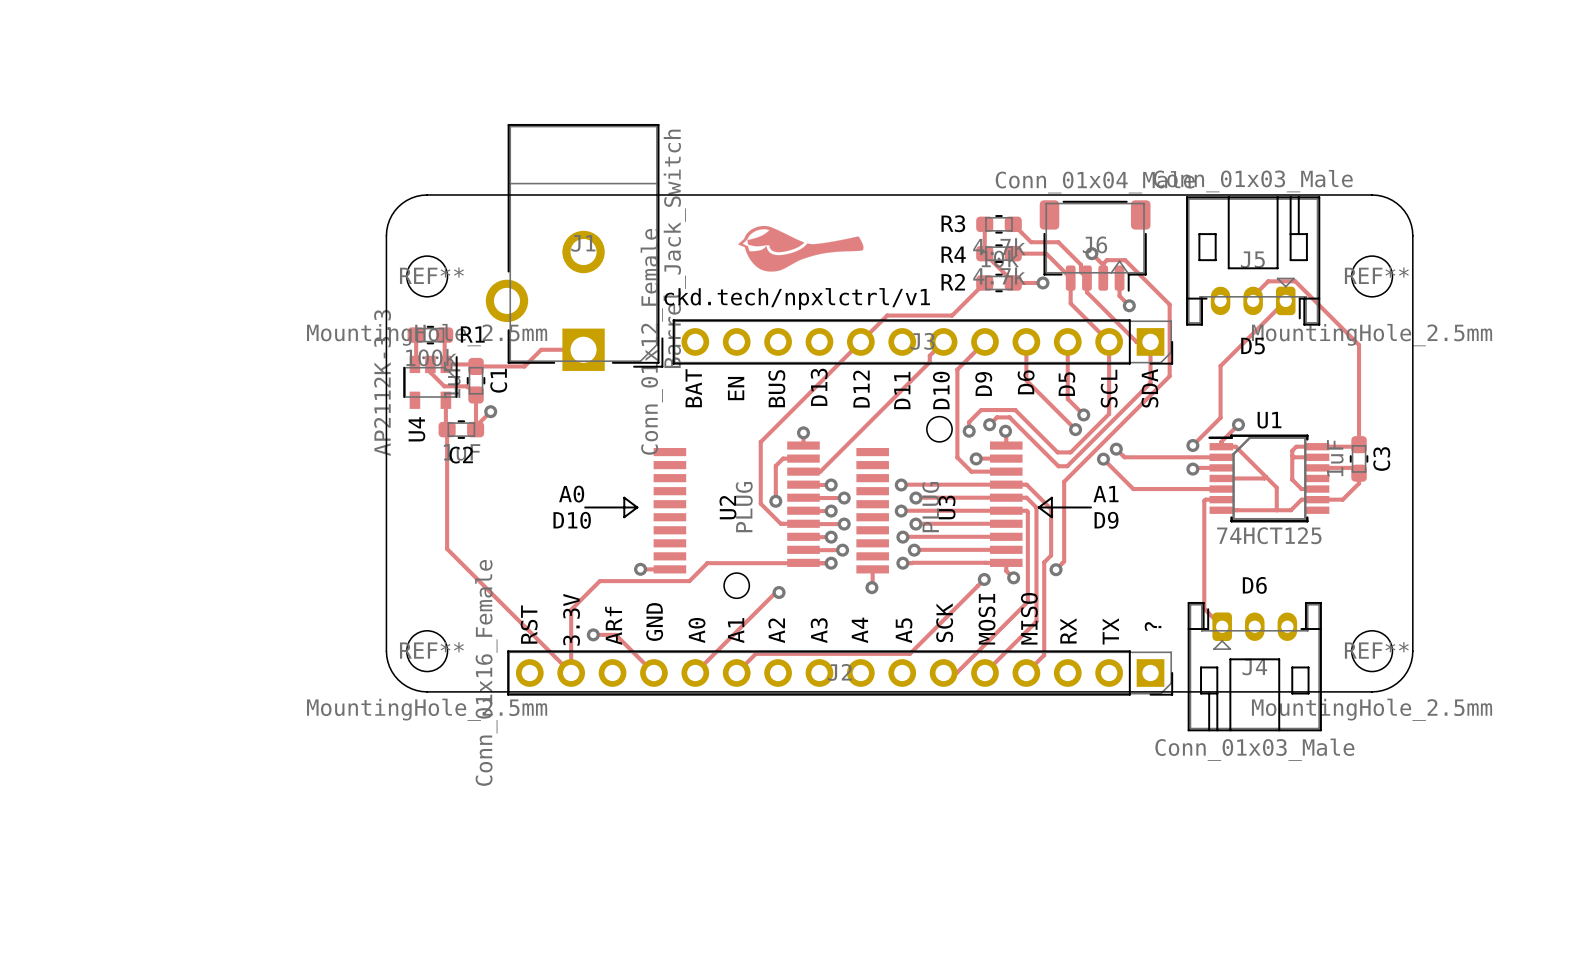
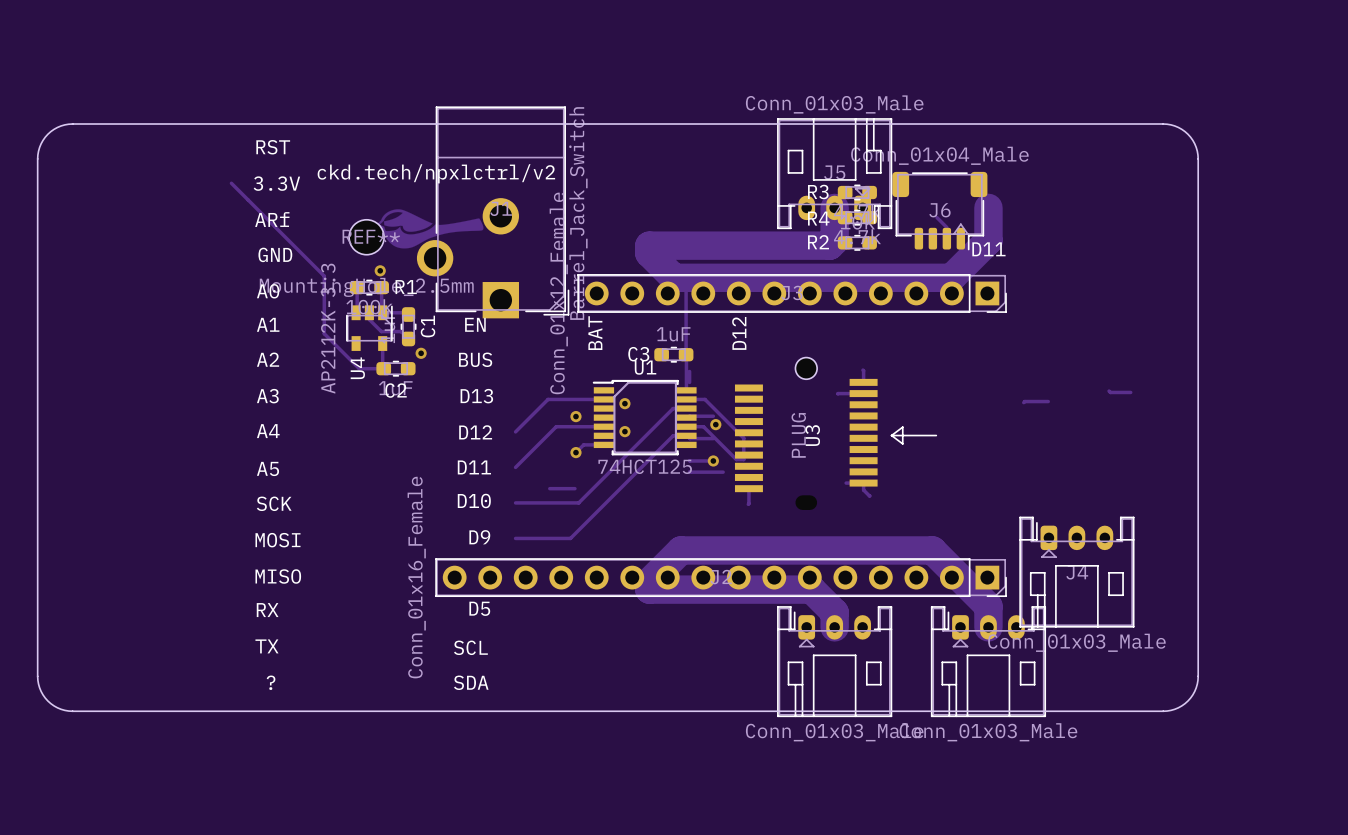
text: none -> RST (273, 147)
board edge: (427, 194) (1372, 194) (1387, 198) (1400, 206) (1407, 215) (1412, 235) (1412, 651) (1409, 666) (1396, 683) (1387, 688) (1372, 691) (427, 691) (411, 688) (394, 675) (387, 661) (386, 651) (386, 235) (389, 220) (398, 206) (411, 198) (427, 194) -> (72, 124) (61, 125) (47, 134) (39, 147) (37, 158) (37, 676) (43, 694) (57, 707) (72, 711) (1163, 711) (1181, 705) (1194, 691) (1198, 676) (1198, 158) (1192, 140) (1178, 127) (1163, 124) (72, 124)
text: none -> ckd.tech/npxlctrl/v2 (436, 173)
text: none -> 3.3V (276, 183)
track: (984, 224) (984, 253) (1013, 282) (1042, 282) -> none
track: (1013, 224) (1031, 242) (1058, 242) (1080, 264) (1080, 272) (1086, 278) (1086, 292) (1136, 341) (1150, 341) (1150, 382) (1067, 466) (1058, 466) (1009, 417) (996, 417) (989, 424) -> none
track: none -> (834, 207) (834, 240) (829, 245) (649, 245)
track: none -> (988, 207) (988, 240) (951, 277) (673, 277) (649, 253) (649, 245)
drawing position: (800, 248) -> (429, 228)
track: (1013, 253) (1046, 253) (1070, 278) (1070, 303) (1109, 341) (1109, 413) (1070, 452) (1057, 452) (1015, 410) (981, 410) (969, 422) (969, 431) -> none
via: (1091, 253) -> none
text: none -> ARf (272, 219)
J5 position: (1253, 260) -> (834, 173)
REF**: MountingHole_2.5mm (1372, 276) -> none
track: (1103, 278) (1103, 263) (1106, 260) (1125, 260) (1169, 304) (1169, 376) (1064, 481) (1064, 561) (1056, 569) -> none
track: (984, 282) (952, 315) (887, 315) (760, 442) (760, 503) (780, 523) (844, 524) -> none
via: (1042, 282) -> none
track: none -> (649, 245) (686, 282) (686, 390)
text: none -> D11 (988, 249)
text: none -> GND (275, 254)
text: ckd.tech/npxlctrl/v1 (797, 298) -> none
track: (1253, 300) (1253, 296) (1268, 281) (1295, 281) (1359, 345) (1359, 444) (1357, 446) (1296, 446) (1292, 450) (1292, 479) (1301, 489) (1317, 489) -> none
track: (1285, 300) (1220, 366) (1220, 417) (1192, 445) -> none
via: (1129, 305) -> none
via: none -> (380, 270)
text: none -> A0 (268, 291)
track: (943, 341) (929, 355) (929, 362) (820, 471) (803, 471) -> none
track: (984, 341) (957, 369) (957, 457) (971, 471) (1006, 471) -> none
track: (1026, 341) (1026, 380) (1075, 429) -> none
track: (1067, 341) (1067, 398) (1083, 414) -> none
text: D5 (1253, 346) -> none
track: (583, 349) (541, 349) (524, 366) (476, 366) -> none
text: none -> A1 (268, 324)
text: D6 (1026, 382) -> none
text: D9 (983, 383) -> none
text: D5 (1066, 384) -> none
text rotation: 0° (819, 387) -> 90° clockwise (476, 396)
text position: D13 (819, 387) -> D13 (476, 396)
text rotation: 0° (736, 388) -> 90° clockwise (475, 324)
text position: EN (736, 388) -> EN (475, 324)
text rotation: 0° (776, 388) -> 90° clockwise (475, 359)
text position: BUS (776, 388) -> BUS (475, 359)
text: SCL (1109, 388) -> none
text: SDA (1149, 388) -> none
text: D11 (902, 390) -> none
text: D10 (941, 390) -> none
track: (476, 394) (476, 429) (475, 429) (475, 426) (490, 411) -> none
via: (1083, 414) -> none
text: none -> A2 (268, 359)
via: (989, 424) -> none
track: (1238, 424) (1221, 441) (1221, 446) (1235, 446) (1276, 487) (1276, 510) -> none
via: (1238, 424) -> none
track: (447, 429) (447, 548) (571, 673) (571, 609) (599, 581) (689, 581) (707, 563) (831, 563) -> (383, 368) (359, 368) (324, 333) (324, 276) (231, 183)
via: (1075, 429) -> none
via: (969, 431) -> none
via: (1005, 431) -> none
via: (803, 432) -> none
via: (1192, 445) -> none
track: (1116, 449) (1124, 457) (1221, 457) -> none
via: (1116, 449) -> none
track: (803, 458) (783, 458) (775, 465) (775, 501) -> none
via: (976, 458) -> none
C3 rotation: 0° (1359, 458) -> 90° clockwise (673, 354)
C3 position: (1359, 458) -> (673, 354)
track: (1103, 459) (1133, 489) (1221, 489) -> none
via: (1103, 459) -> none
C3 name position: C3 (1381, 459) -> C3 (638, 354)
text: none -> A3 (267, 396)
track: none -> (603, 399) (548, 399) (515, 431)
track: none -> (686, 399) (704, 399) (743, 438) (743, 459) (736, 459) (703, 426) (686, 426)
track: (1317, 467) (1353, 467) (1359, 473) (1359, 483) (1342, 499) (1301, 499) (1291, 510) (1221, 510) -> none
via: (1192, 469) -> none
via: none -> (624, 403)
track: none -> (686, 408) (673, 408) (578, 502) (515, 502)
track: (1266, 476) (1221, 478) -> none
U1 position: (1268, 478) -> (644, 417)
via: (831, 484) -> none
track: (901, 484) (1026, 484) (1051, 509) (1051, 555) (1044, 562) (1044, 655) (1026, 673) -> none
via: (901, 484) -> none
via: none -> (575, 416)
text: A0 (571, 494) -> none
via: none -> (715, 424)
text: A1 (1105, 494) -> none
track: none -> (603, 426) (556, 426) (515, 467)
track: (803, 497) (844, 498) -> none
via: (844, 498) -> none
track: (915, 498) (1026, 497) (1036, 507) (1036, 621) (984, 673) -> none
via: (915, 498) -> none
track: (1221, 499) (1204, 500) (1204, 608) (1222, 626) -> none
via: (775, 501) -> none
text: none -> A4 (268, 431)
via: none -> (624, 431)
text: none -> D12 (475, 432)
track: none -> (686, 435) (673, 435) (570, 538) (515, 538)
U2: PLUG (702, 509) -> none
via: (831, 511) -> none
track: (901, 511) (1027, 511) (1027, 601) (956, 673) (943, 673) -> none
via: (901, 511) -> none
track: none -> (603, 444) (583, 444) (575, 452)
text position: D10 (572, 520) -> D10 (474, 501)
text: D9 (1106, 520) -> none
track: (1006, 523) (915, 524) -> none
via: (844, 524) -> none
via: (915, 524) -> none
via: none -> (575, 452)
track: (1006, 536) (902, 537) -> none
via: (902, 537) -> none
text: none -> D11 (474, 467)
text: none -> A5 (268, 468)
track: (1006, 549) (914, 550) -> none
via: (842, 550) -> none
via: (914, 550) -> none
track: (985, 562) (902, 563) -> none
via: (831, 563) -> none
via: (902, 563) -> none
via: (640, 569) -> none
via: (1056, 569) -> none
via: (1013, 577) -> none
track: (984, 579) (909, 653) (755, 653) (736, 673) -> none
via: (984, 579) -> none
text: D6 (1254, 585) -> none
text: none -> SCK (274, 503)
via: (871, 587) -> none
track: (779, 592) (775, 592) (695, 673) -> none
via: (779, 592) -> none
text: MISO (1029, 618) -> none
text: 3.3V (571, 619) -> none
text: MOSI (987, 619) -> none
text: GND (654, 621) -> none
text: SCK (944, 622) -> none
text: RST (529, 624) -> none
text: ARf (613, 625) -> none
text: none -> D9 (479, 537)
text: ? (1153, 626) -> none
text: none -> MOSI (278, 540)
text: A0 (697, 630) -> none
text: A1 (736, 630) -> none
text: A2 (776, 630) -> none
text: A3 (819, 630) -> none
text: A4 (859, 630) -> none
text: A5 (904, 630) -> none
text: RX (1068, 630) -> none
text: TX (1110, 631) -> none
track: (593, 634) (615, 634) (653, 673) -> none
via: (593, 634) -> none
REF**: MountingHole_2.5mm (427, 651) -> none
REF**: MountingHole_2.5mm (1372, 651) -> none
text: none -> MISO (278, 576)
text: none -> D5 (479, 608)
text: none -> RX (267, 610)
track: none -> (834, 627) (834, 612) (811, 589) (649, 589) (649, 581) (680, 550) (932, 550) (988, 606) (988, 627)
text: none -> TX (266, 646)
text: none -> SCL (470, 647)
part: none -> Conn_01x03_Male (834, 661)
part: none -> Conn_01x03_Male (988, 661)
text: none -> ? (271, 682)
text: none -> SDA (471, 682)

